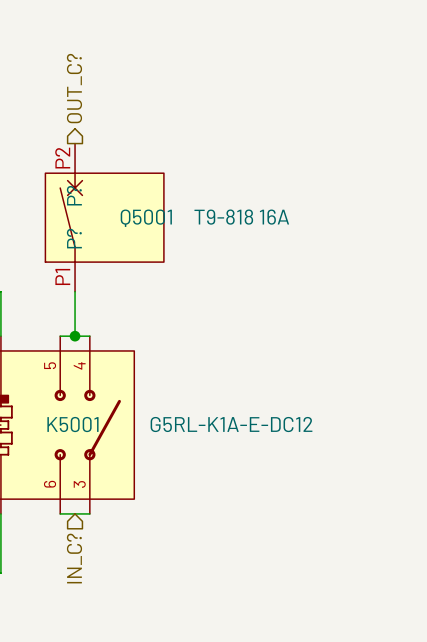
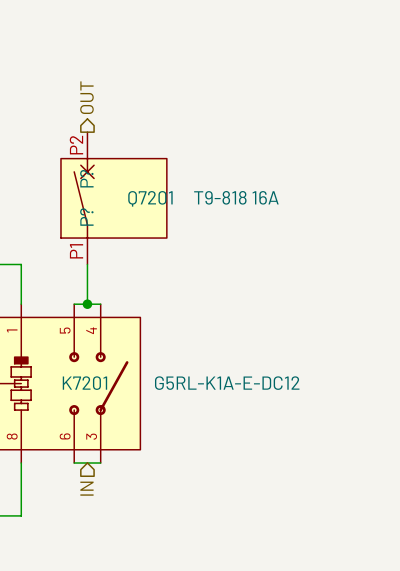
hierarchical label: OUT_C? (74, 88) -> OUT (86, 97)
Q5001 name: Q5001 (146, 218) -> Q7201 (150, 198)
K5001 name: K5001 (72, 424) -> K7201 (84, 383)
hierarchical label: IN_C? (74, 558) -> IN (86, 488)

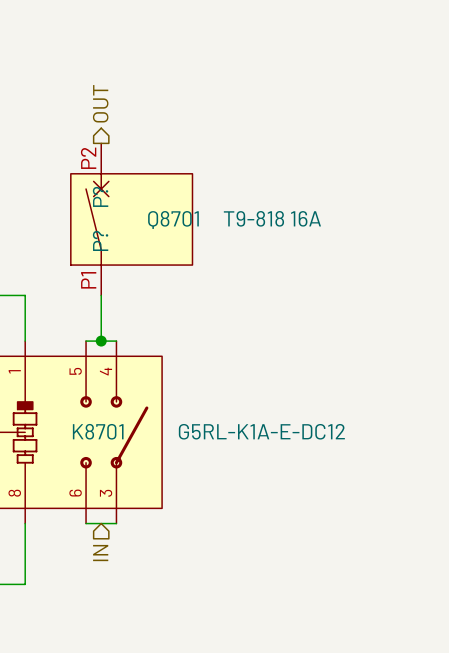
Q7201 name: Q7201 (150, 198) -> Q8701 (173, 219)
K7201 name: K7201 (84, 383) -> K8701 (98, 431)

